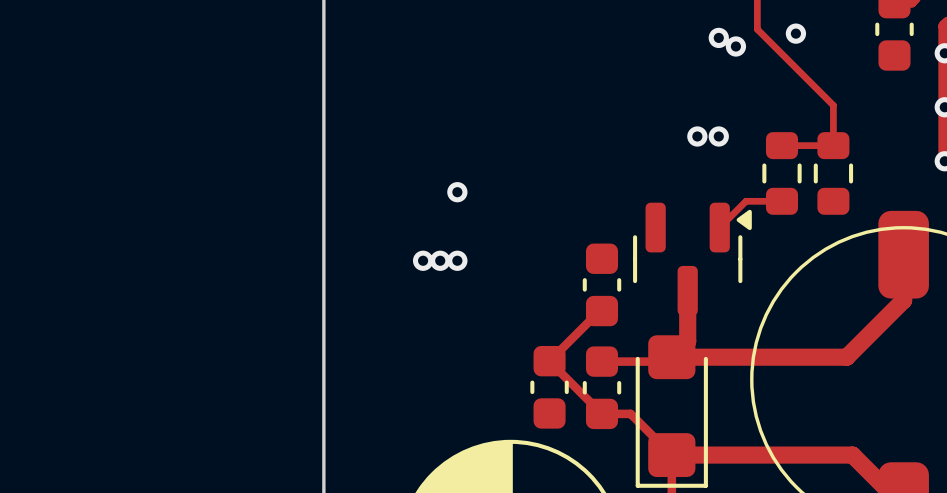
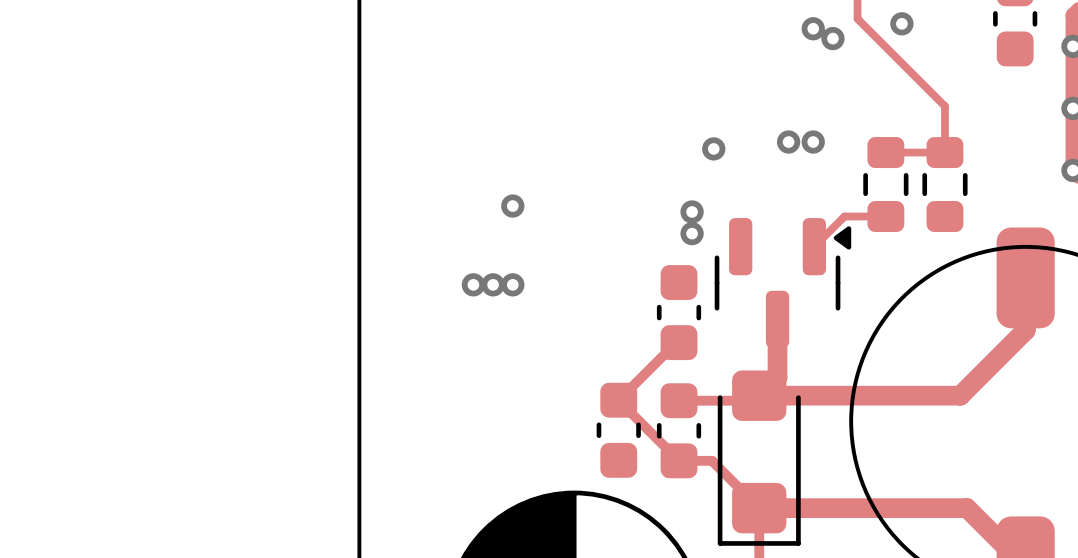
via: none -> (713, 148)
via: none -> (692, 211)
via: none -> (692, 233)

